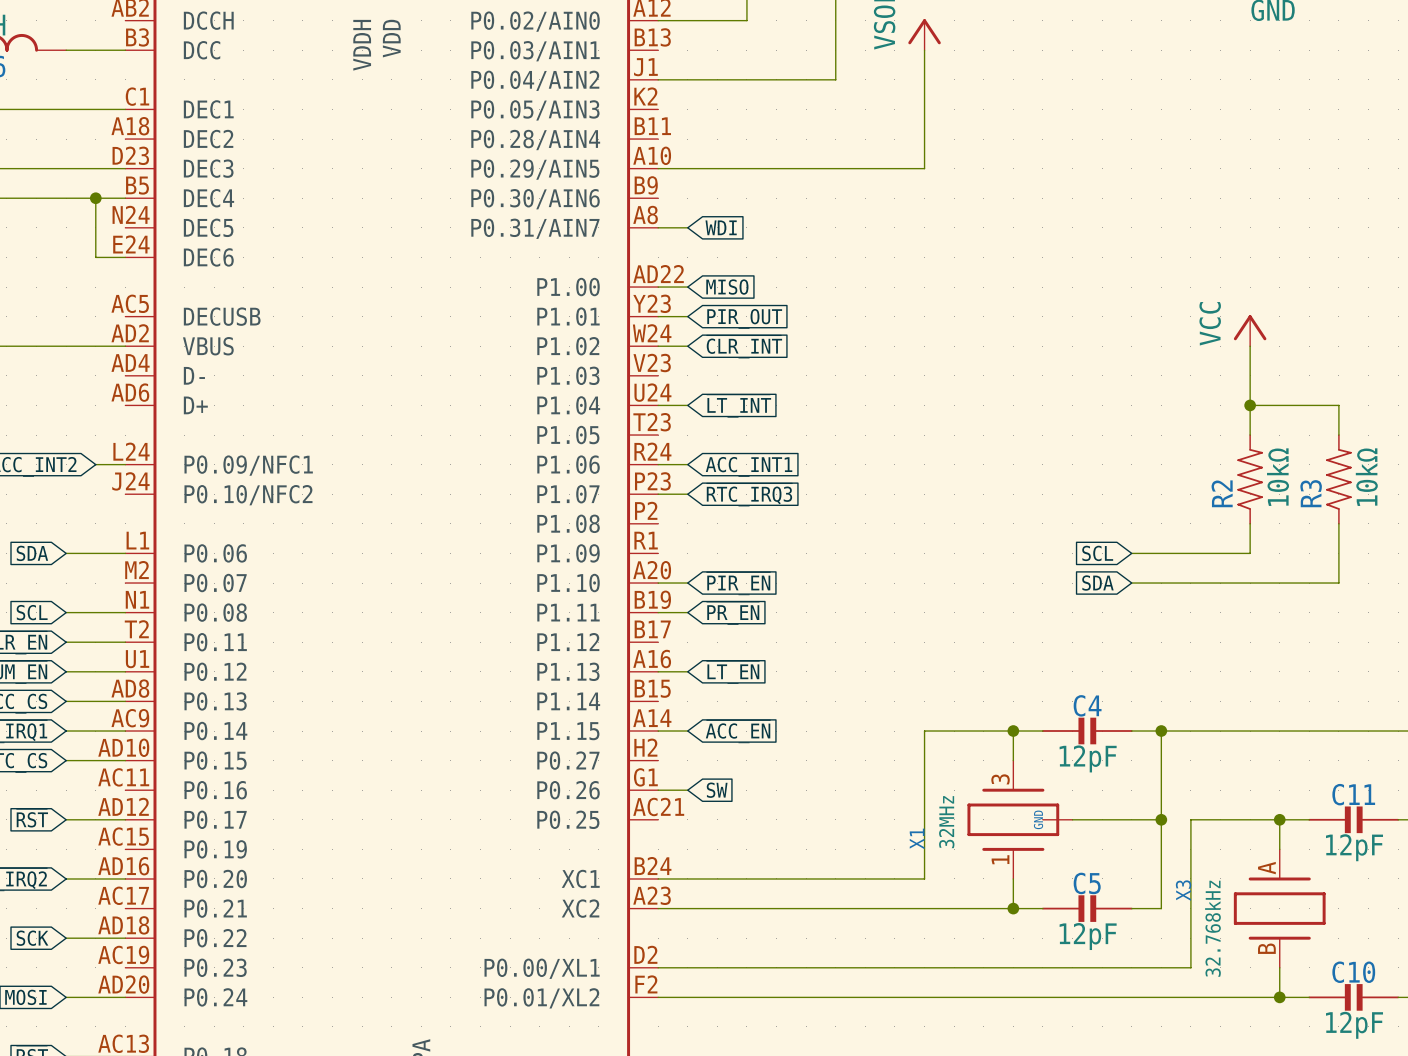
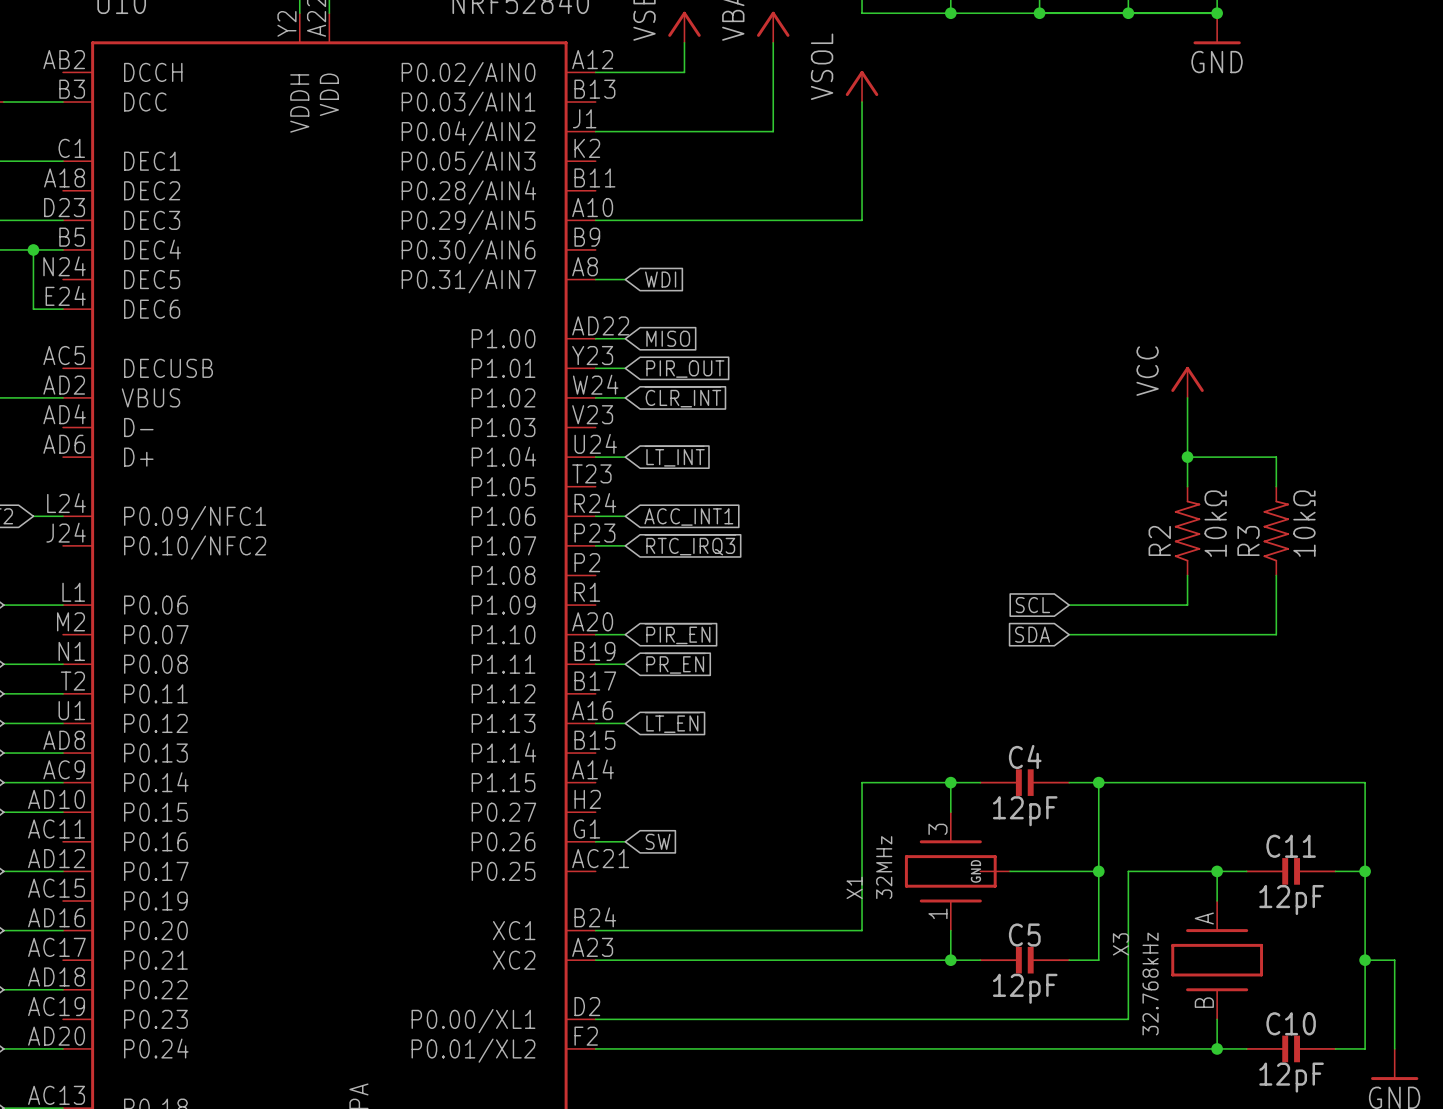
wire: (658, 731) (687, 731) -> none
global label: ~{ACC_EN} (738, 731) -> none

